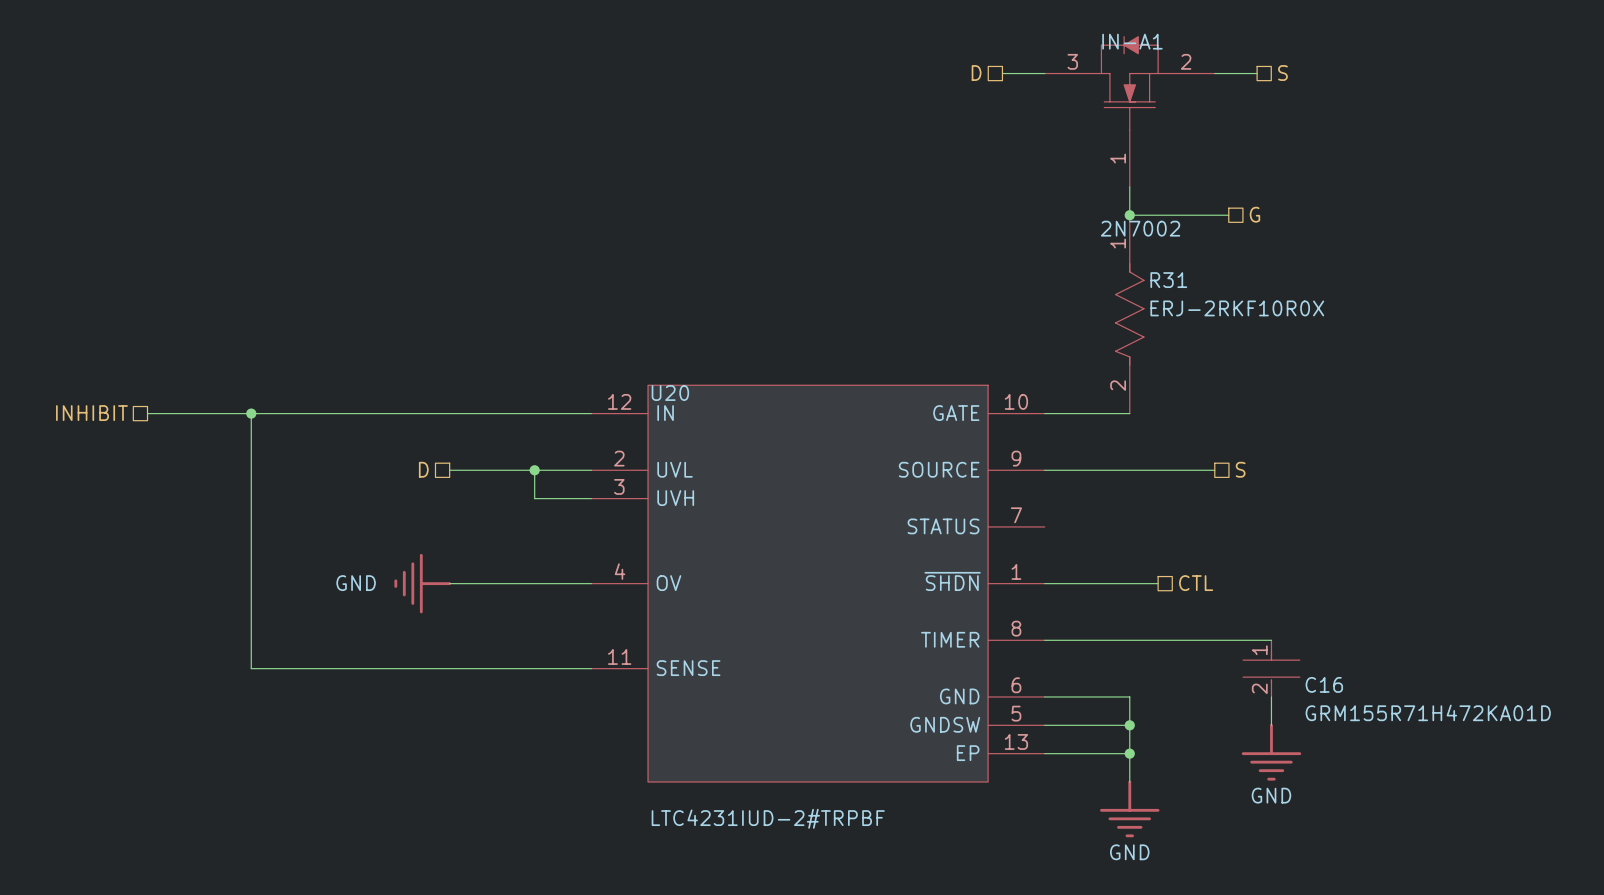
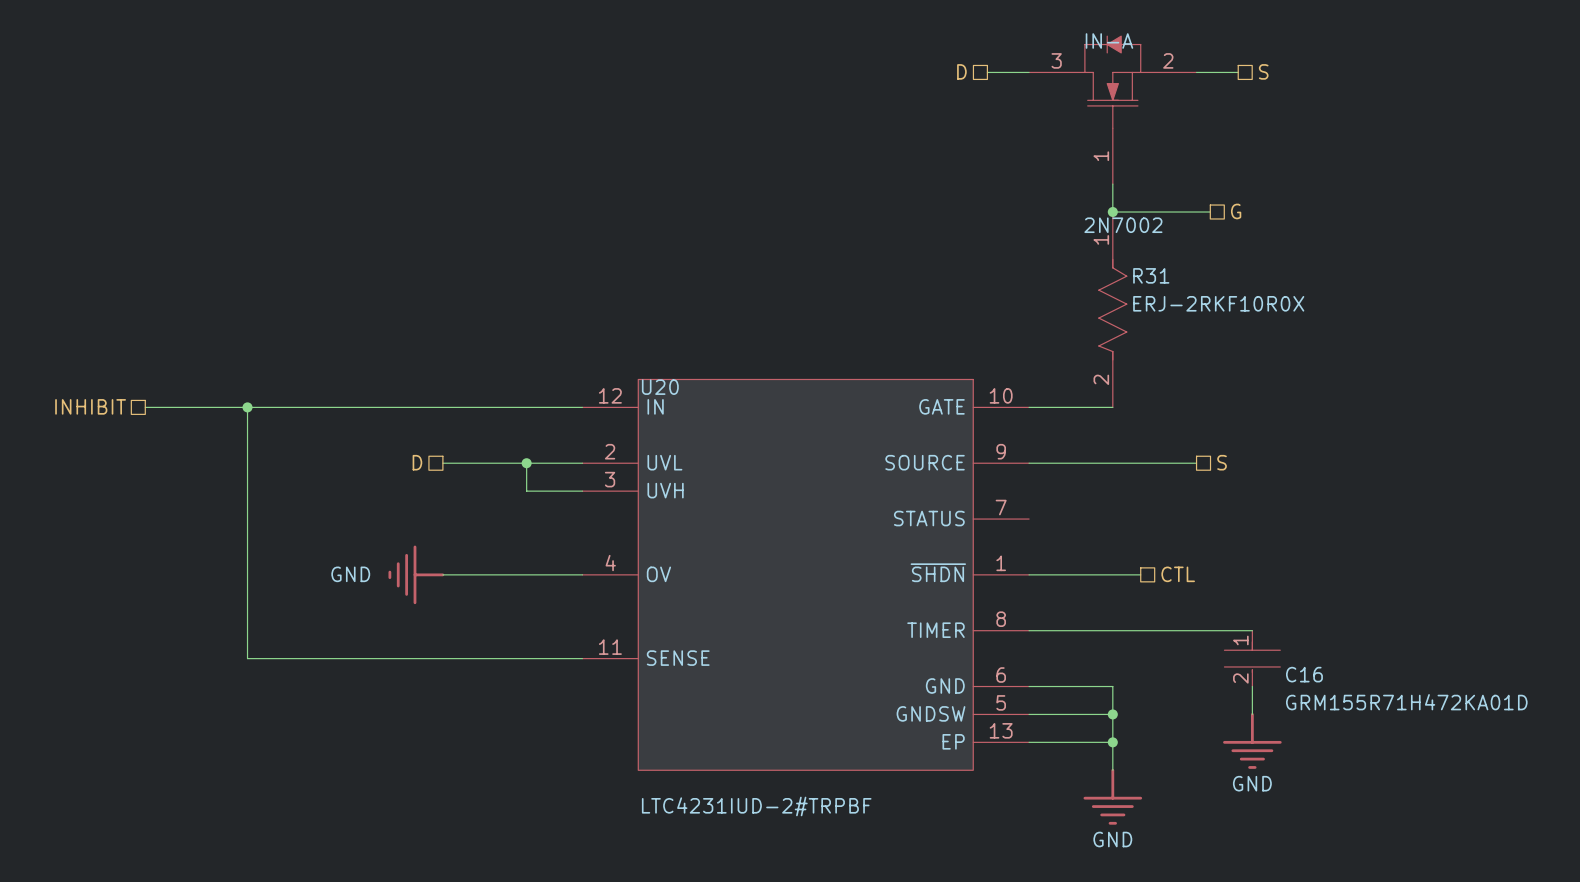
IN-A1 name: IN-A1 (1132, 41) -> IN-A (1109, 41)

